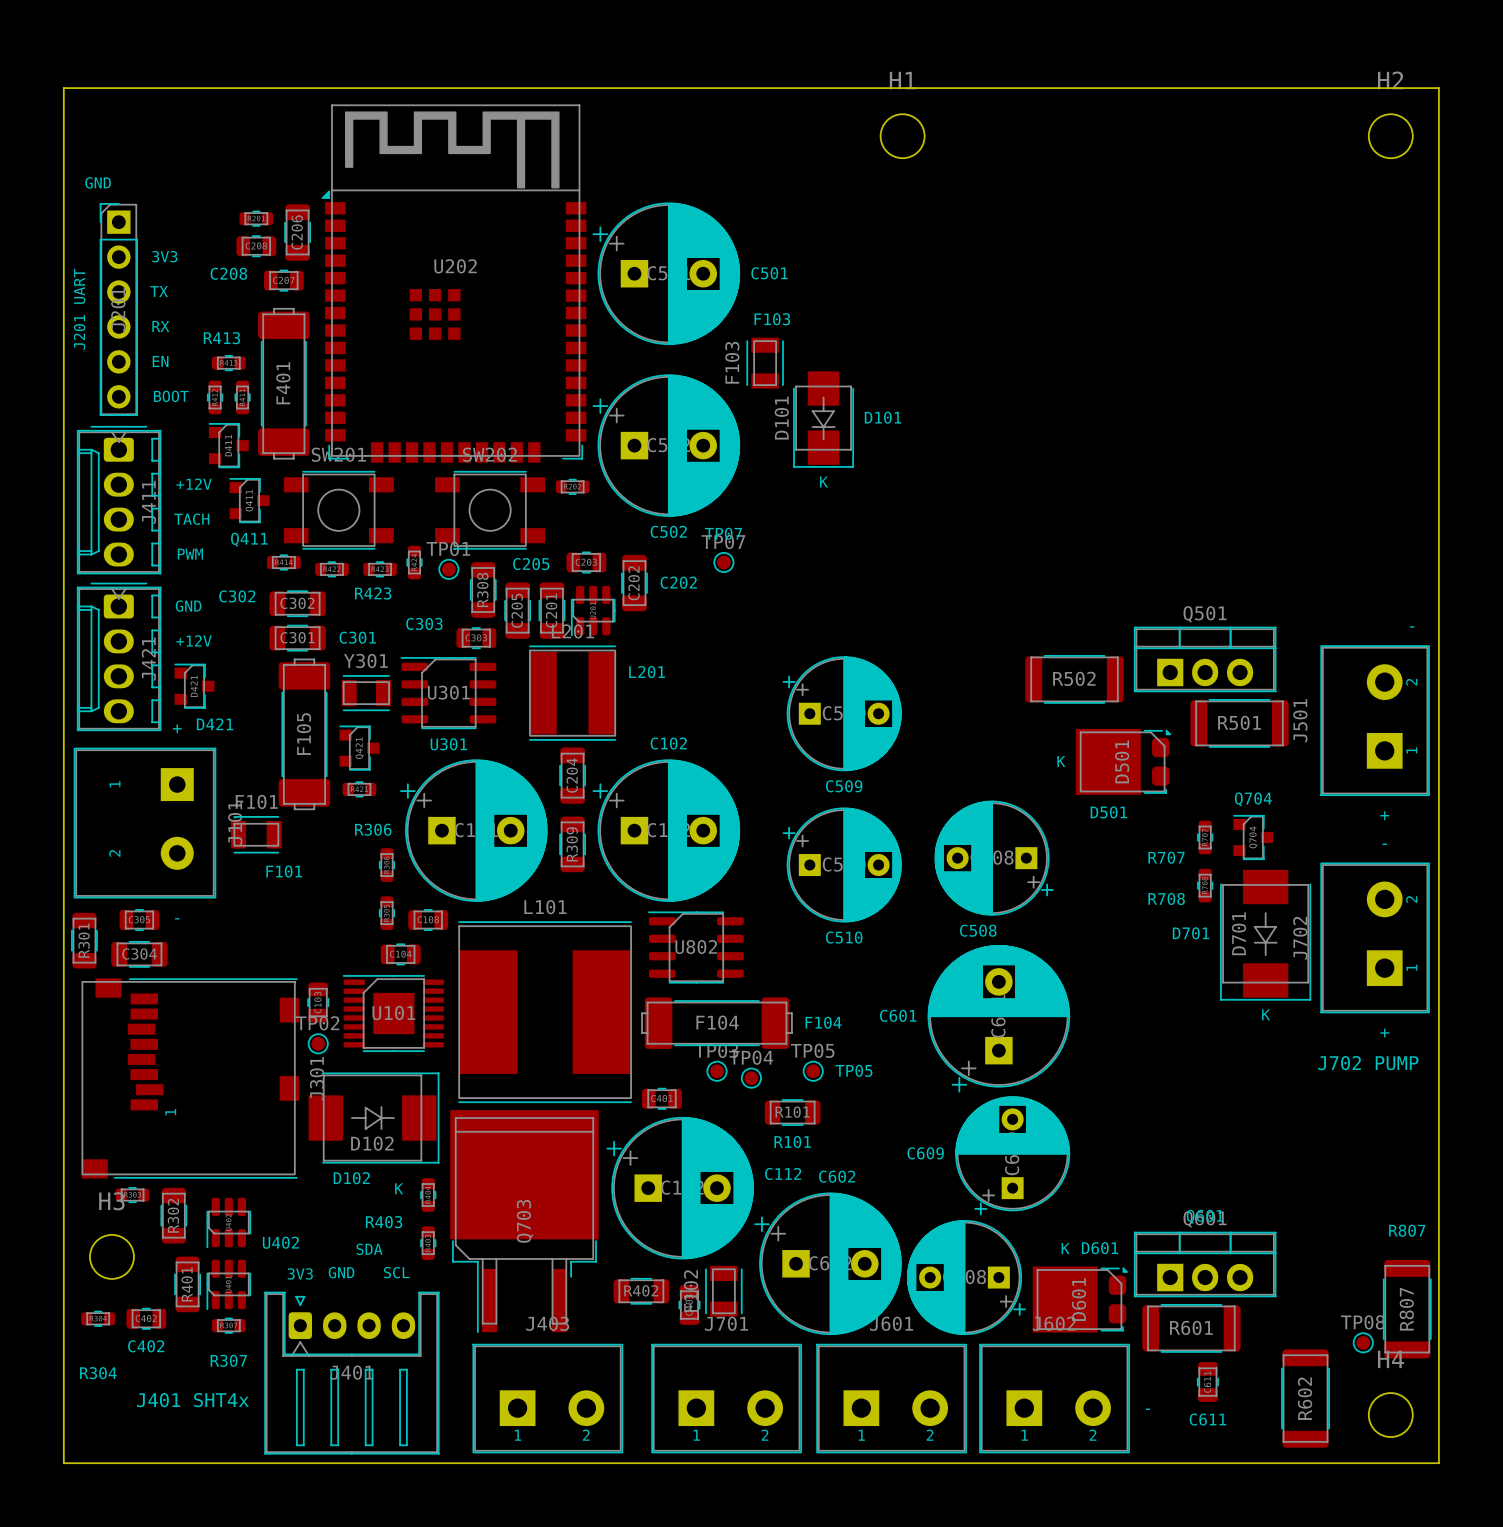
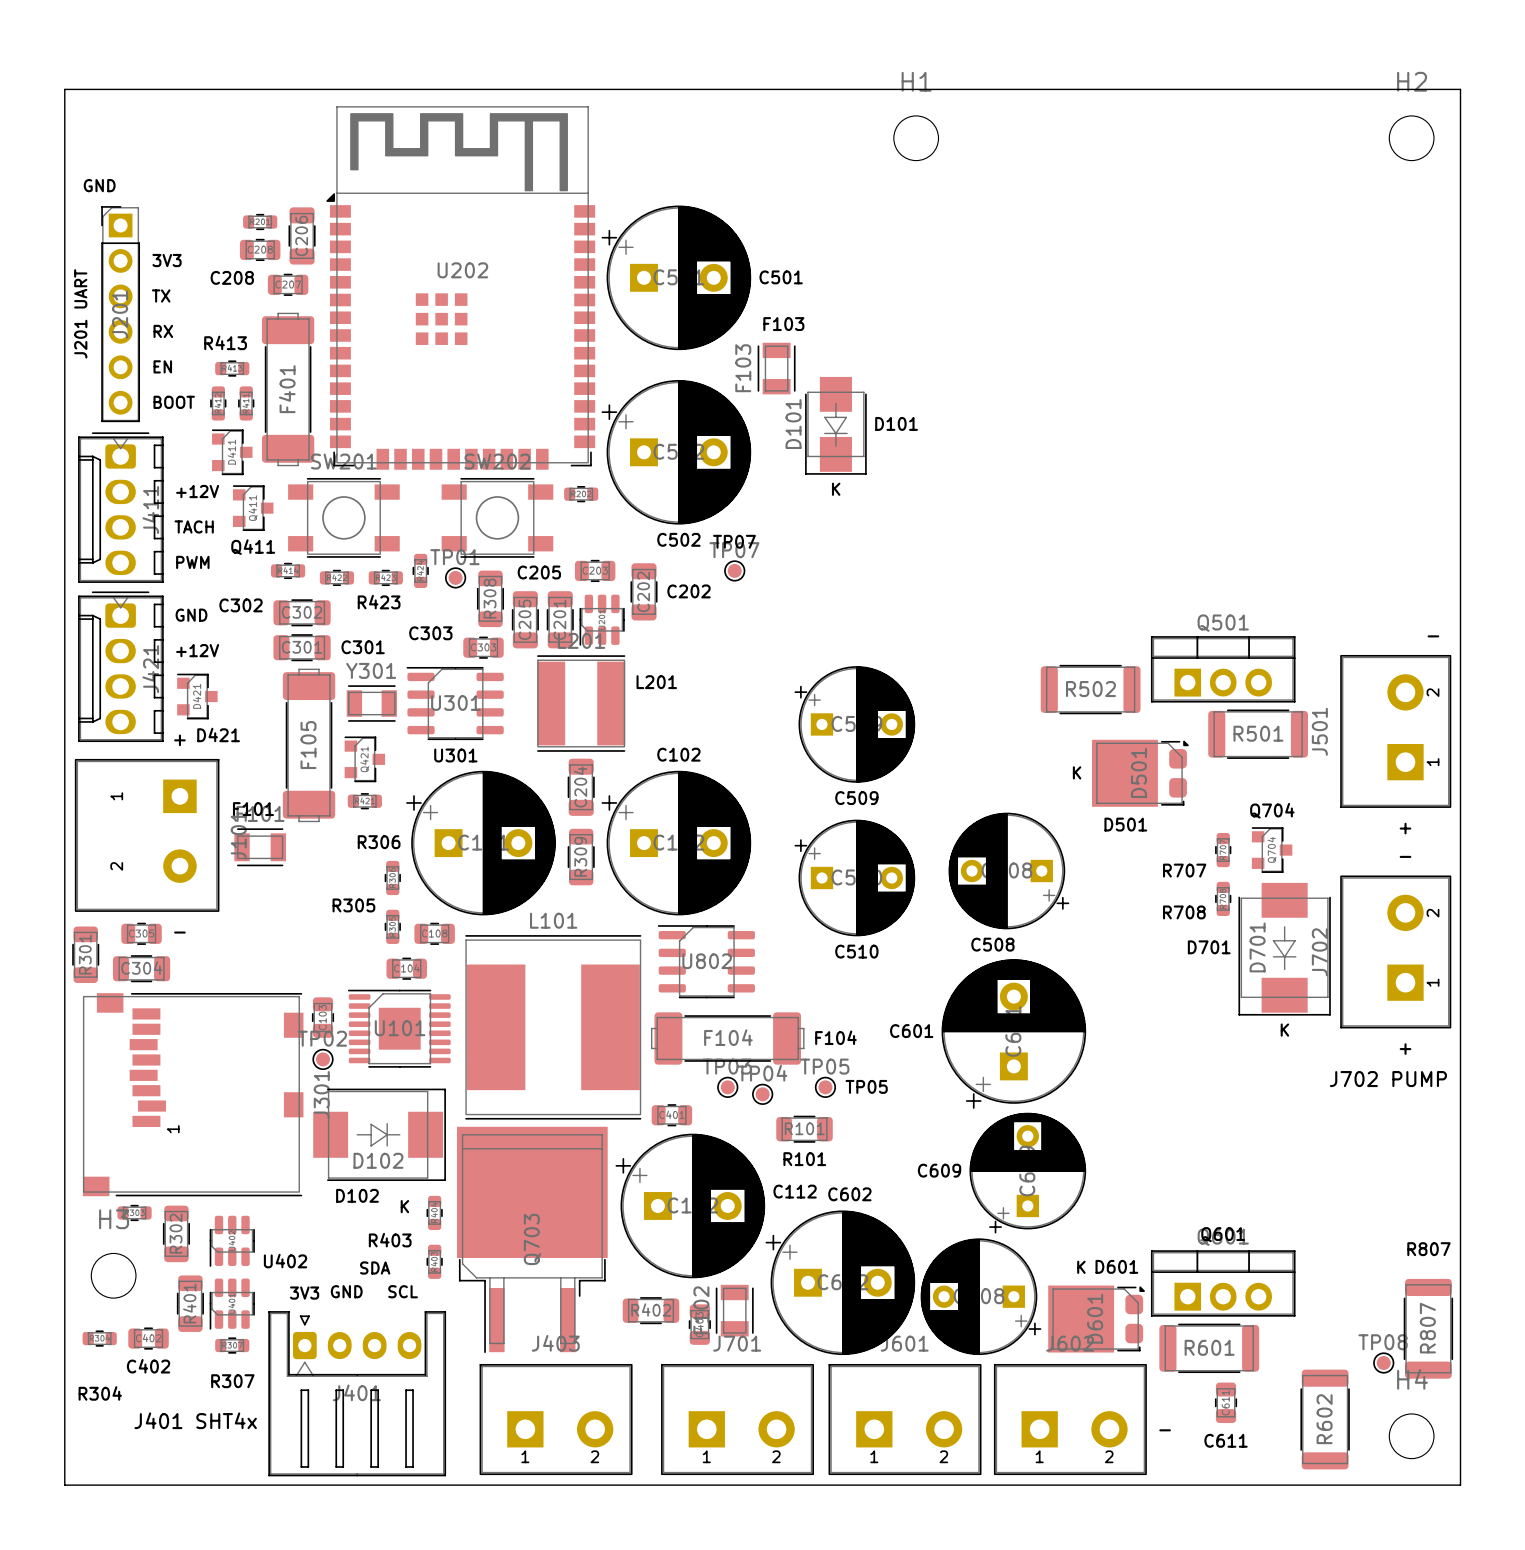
text position: F101 (284, 871) -> F101 (253, 809)
text: none -> R305 (353, 905)

